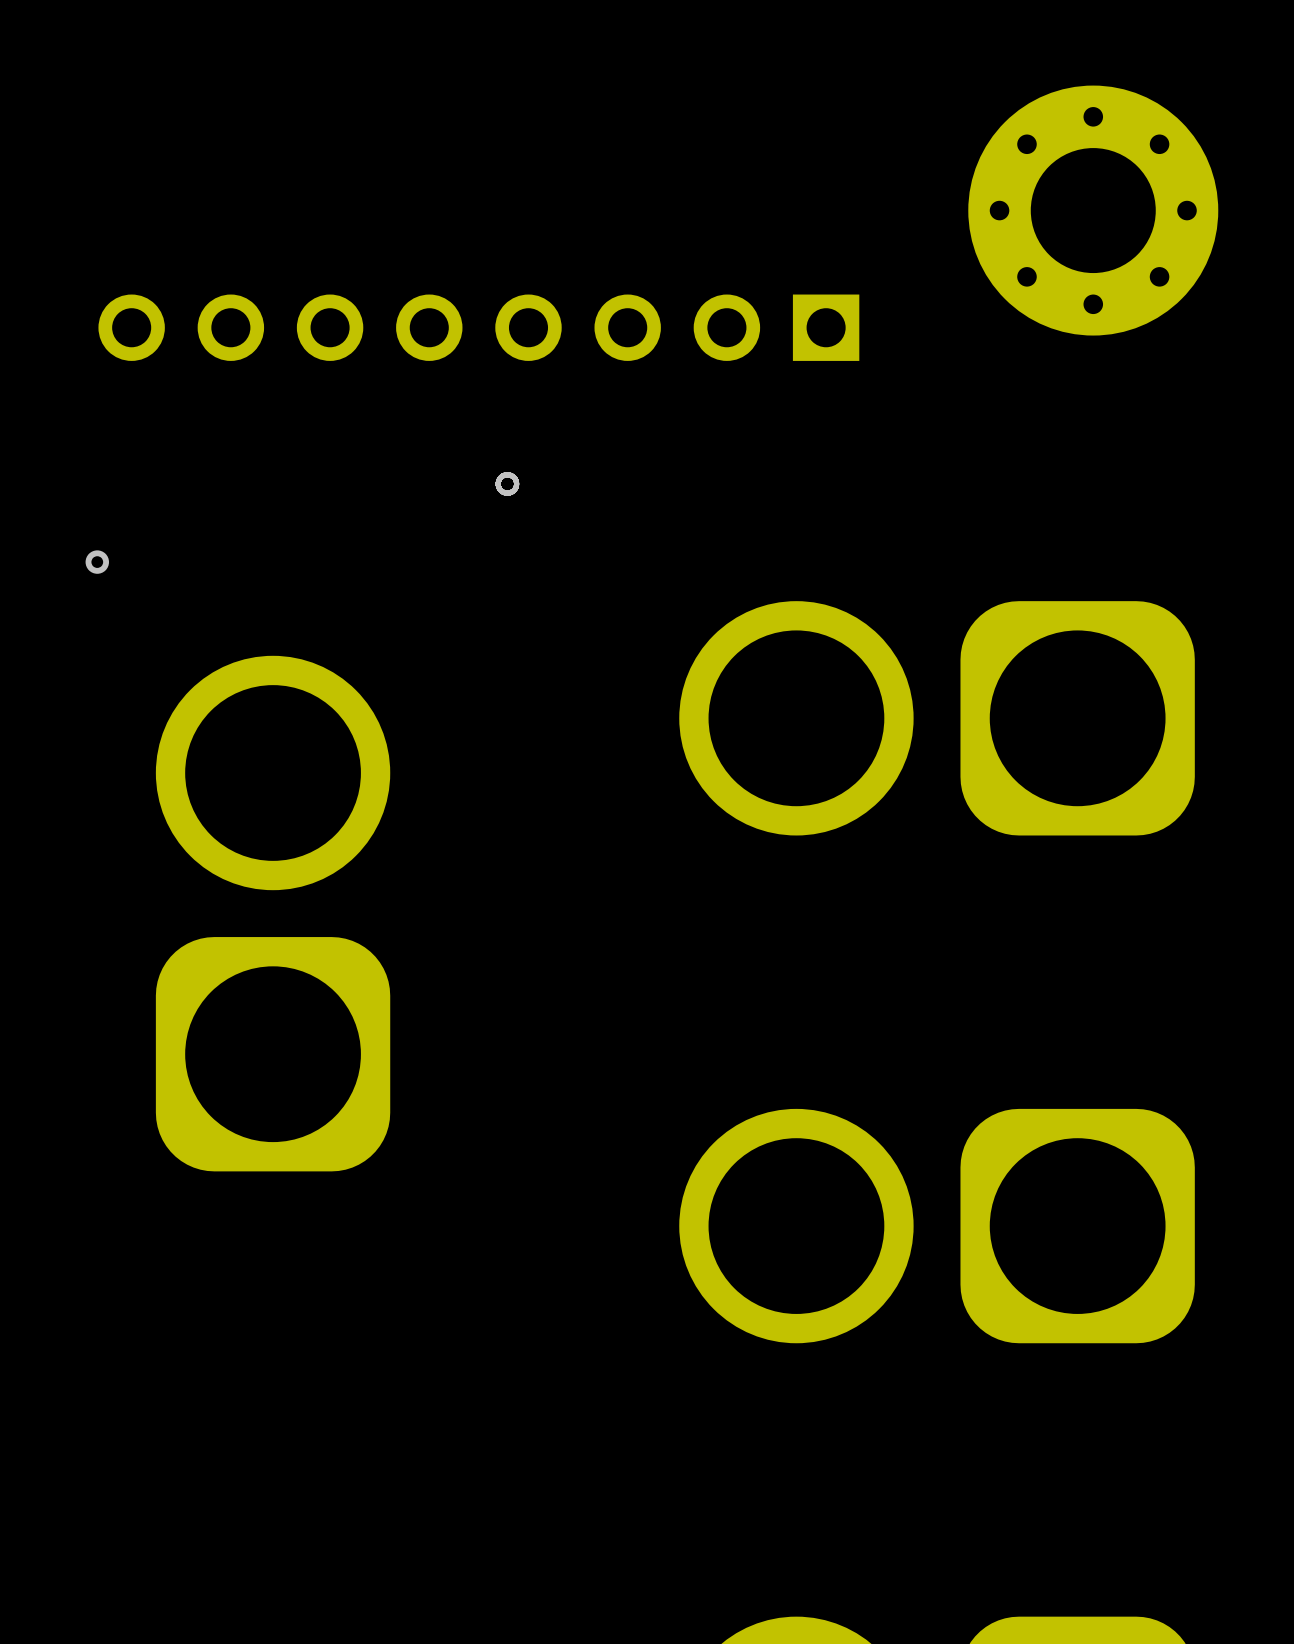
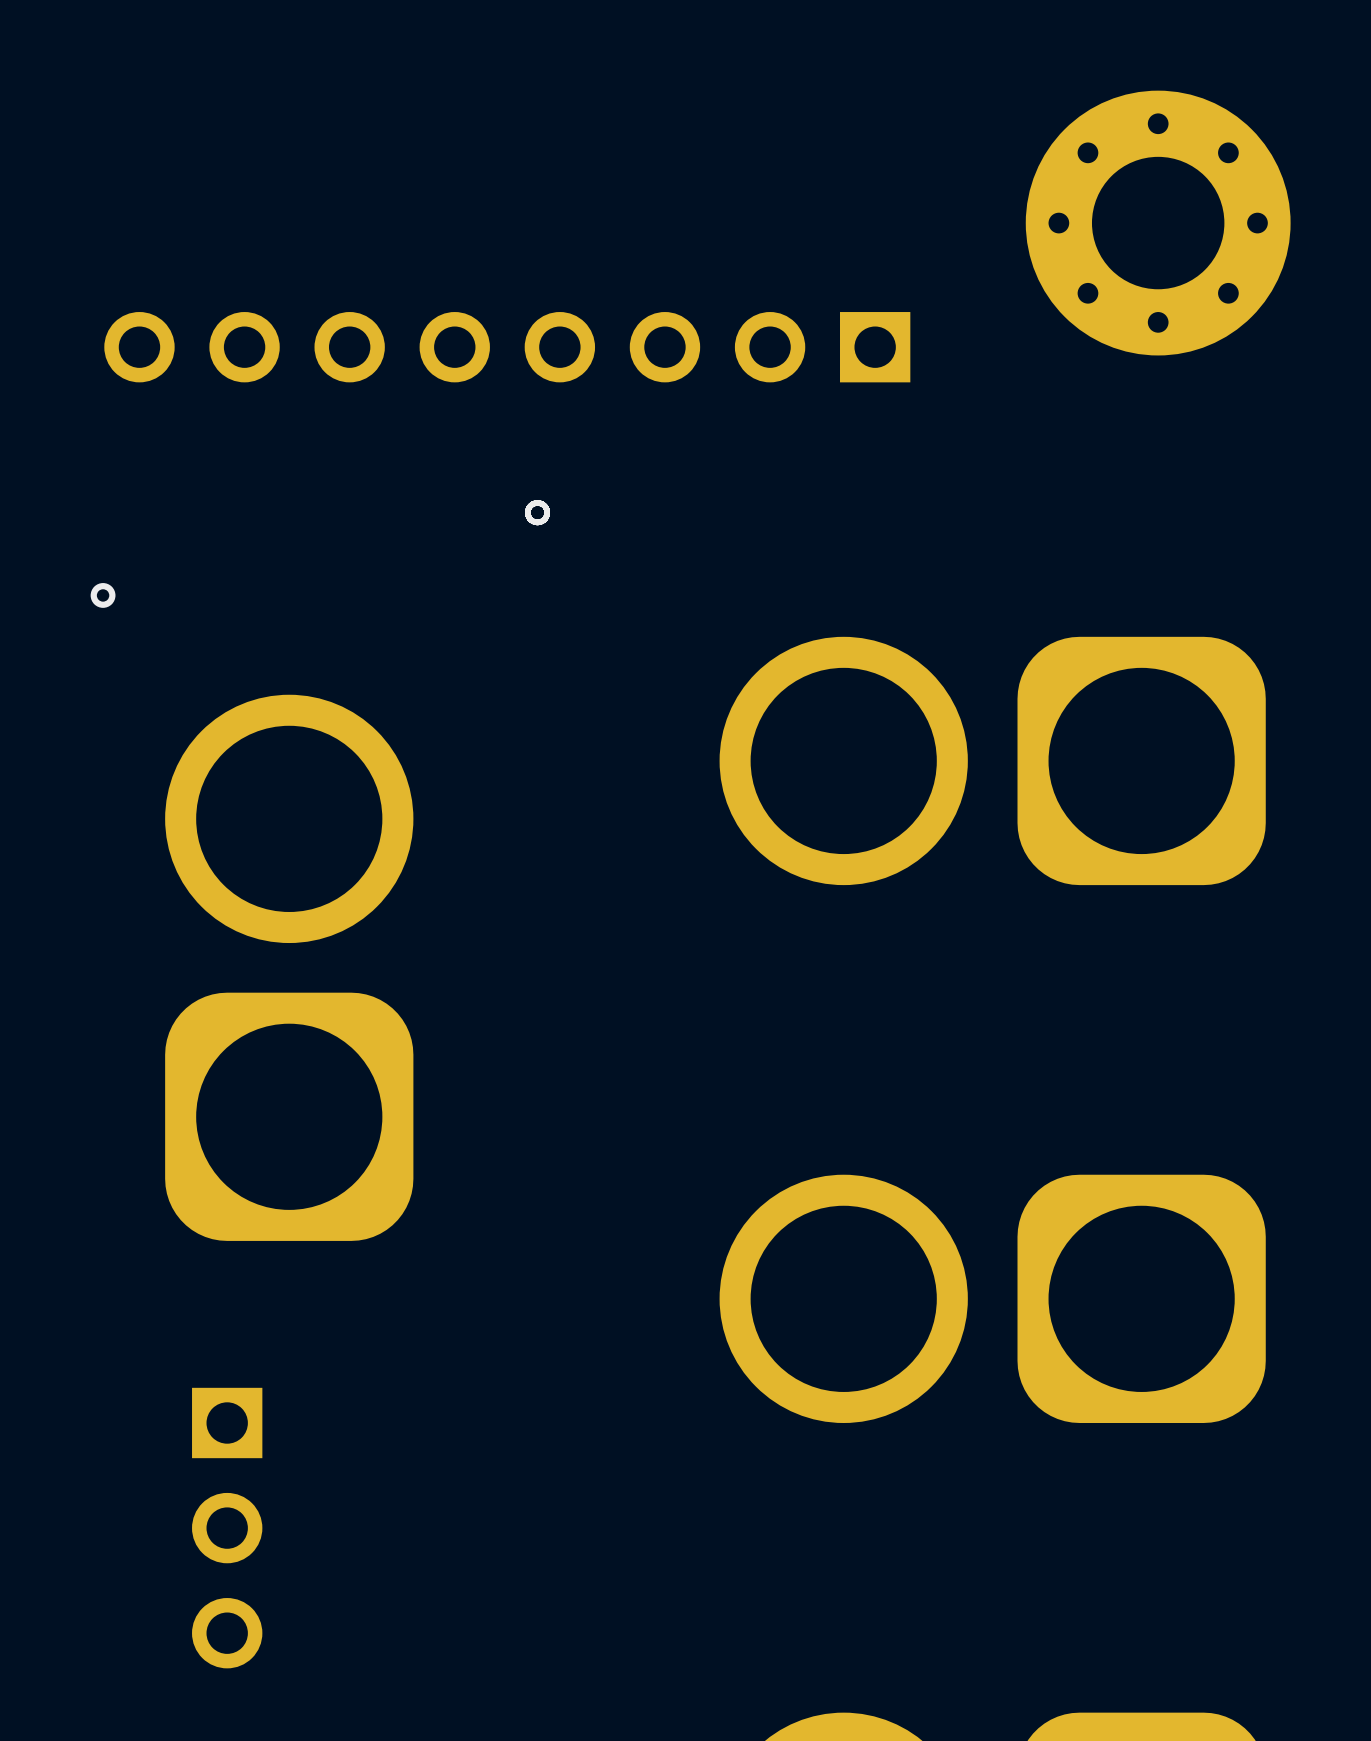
part: none -> (227, 1528)

